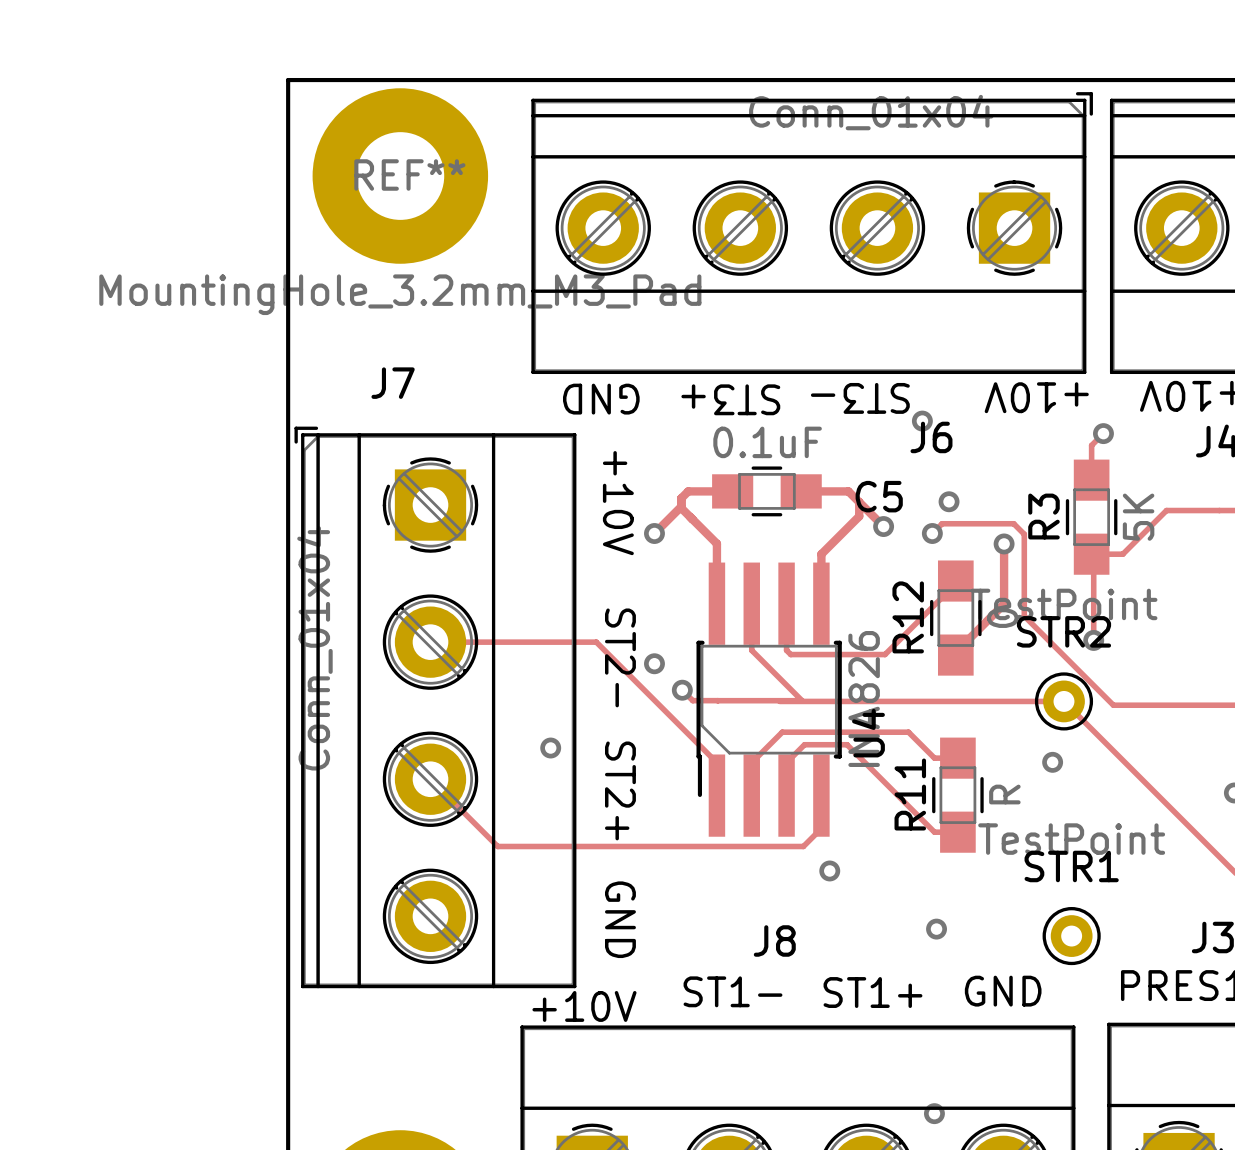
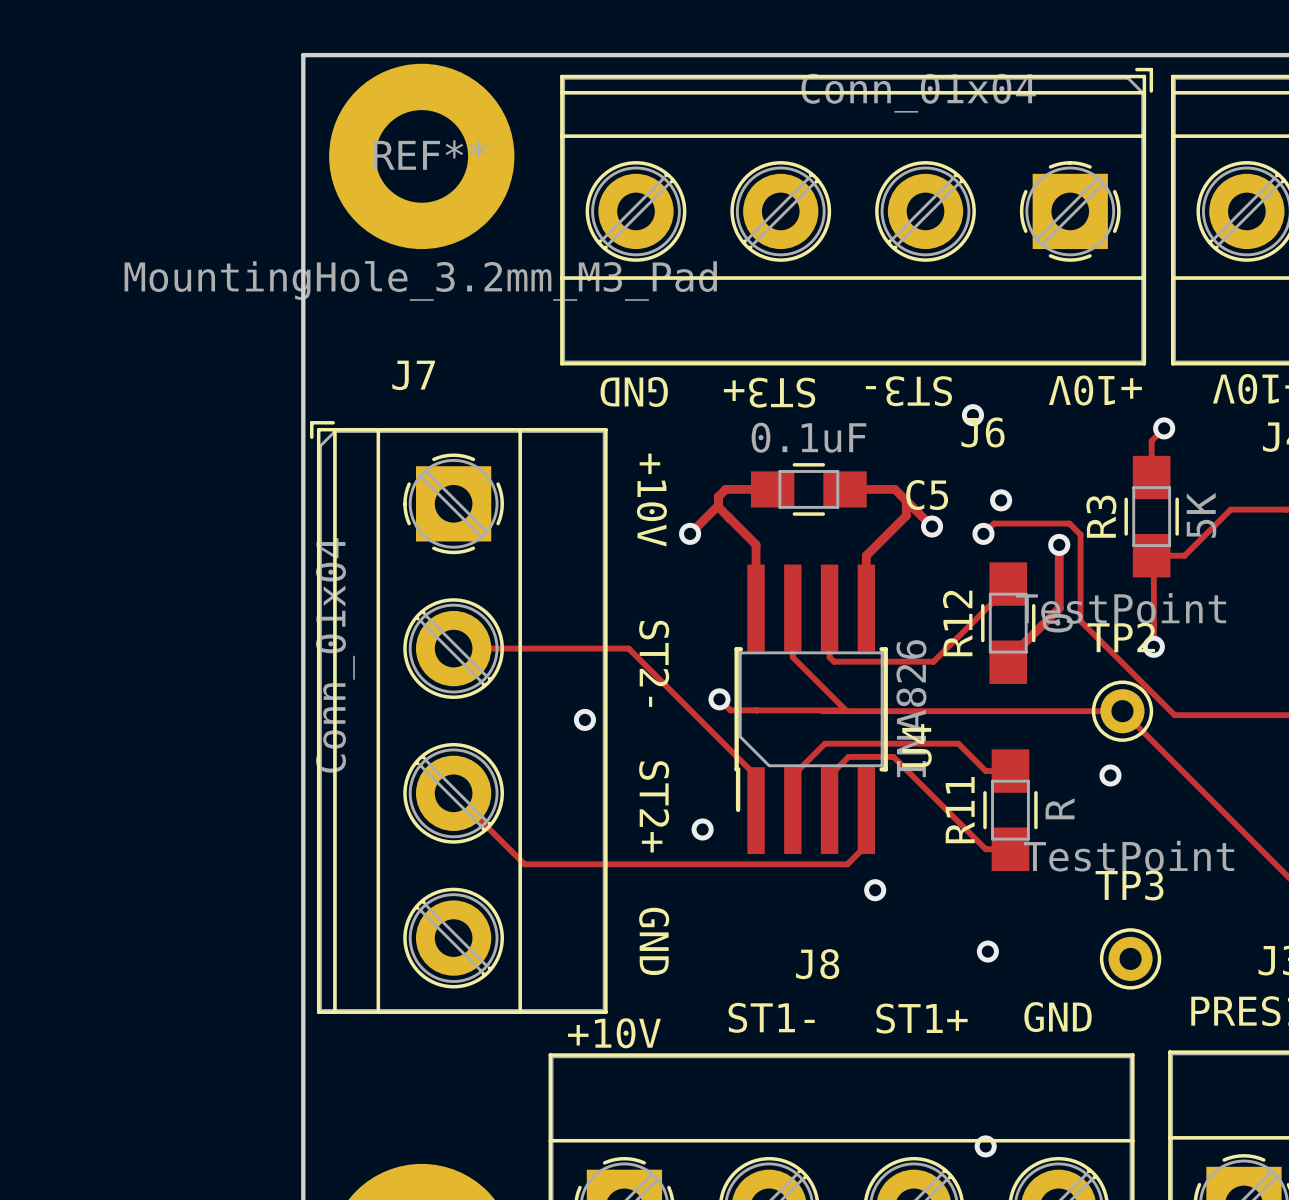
STR2 name: STR2 (1063, 631) -> TP2 (1121, 637)
via: (654, 663) -> none
via position: (550, 748) -> (584, 719)
via: none -> (702, 829)
STR1 name: STR1 (1071, 866) -> TP3 (1129, 885)

